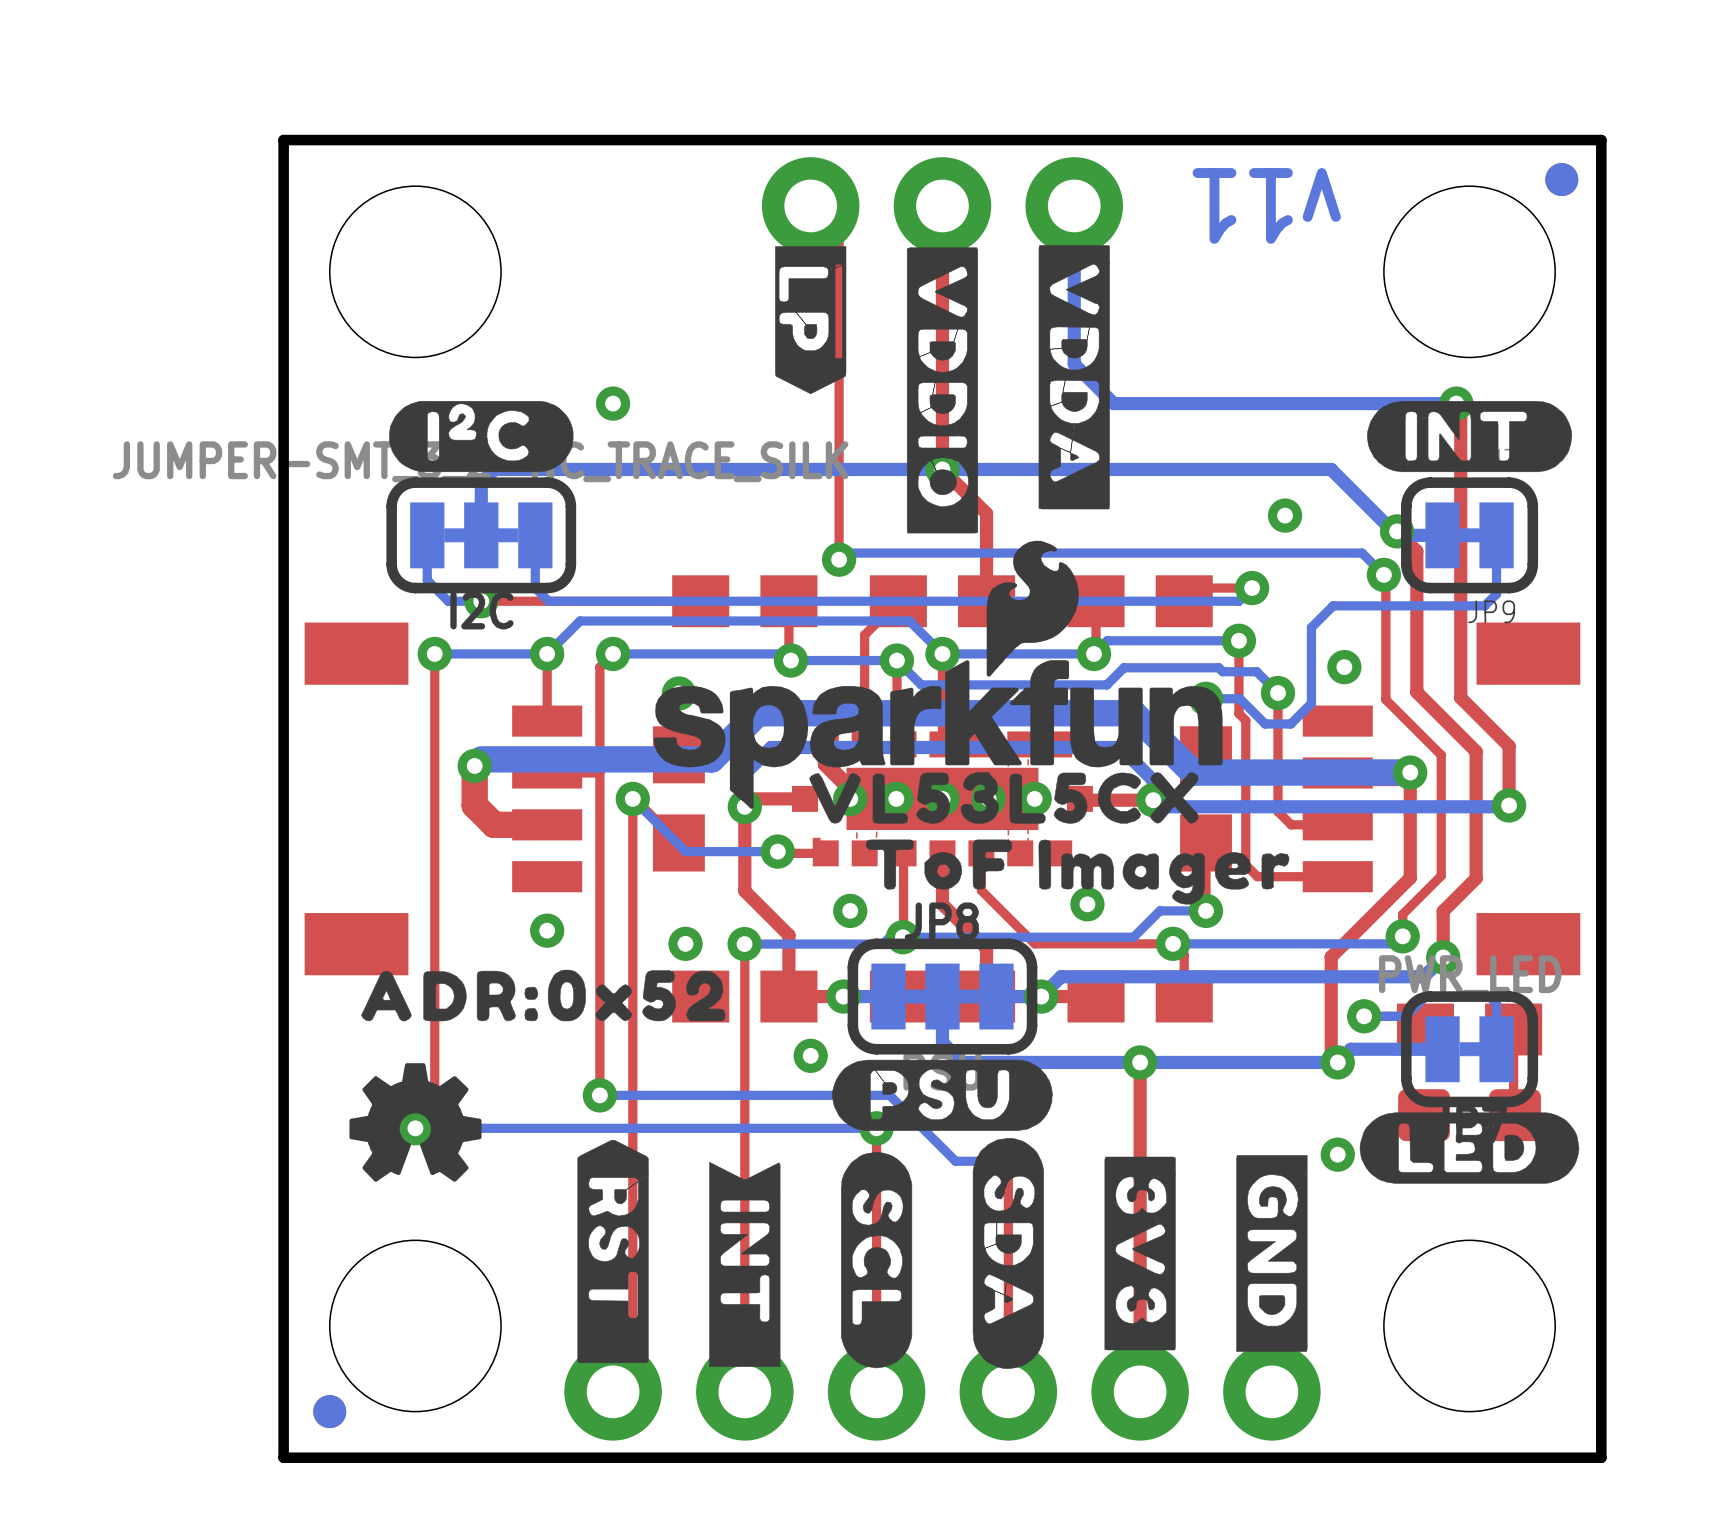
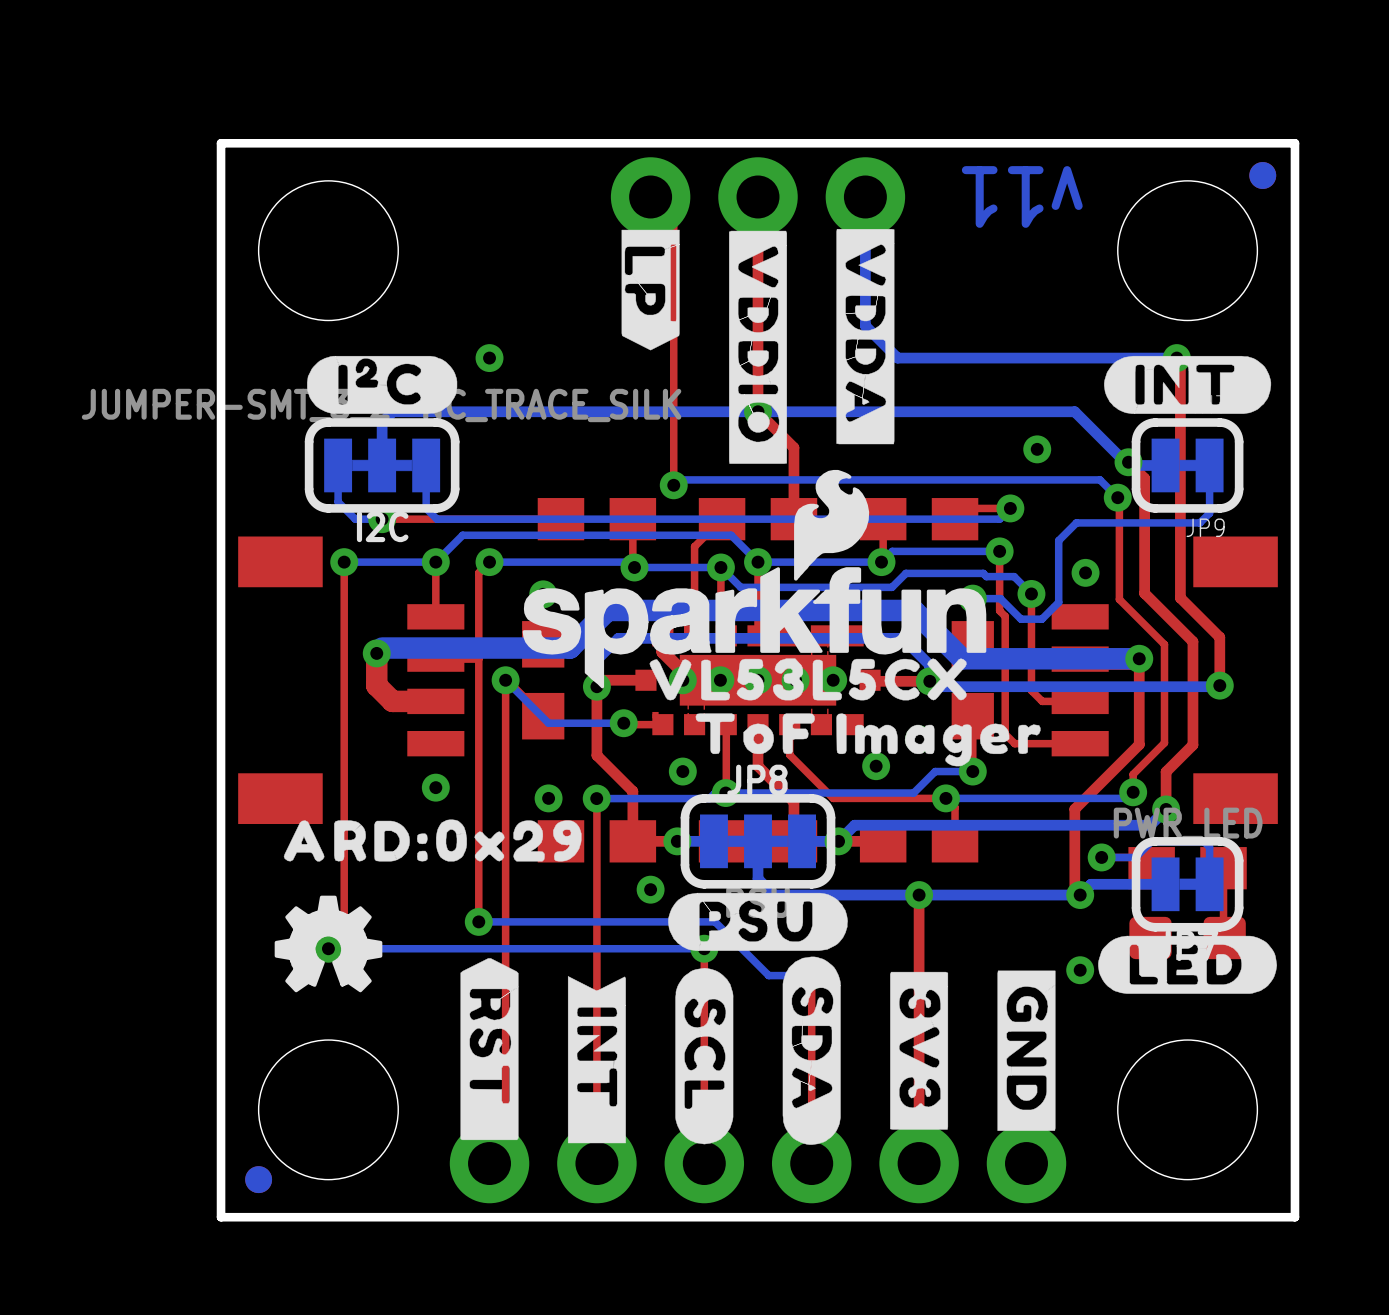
drawing shape: [361, 969, 726, 1022] -> [283, 819, 582, 862]

